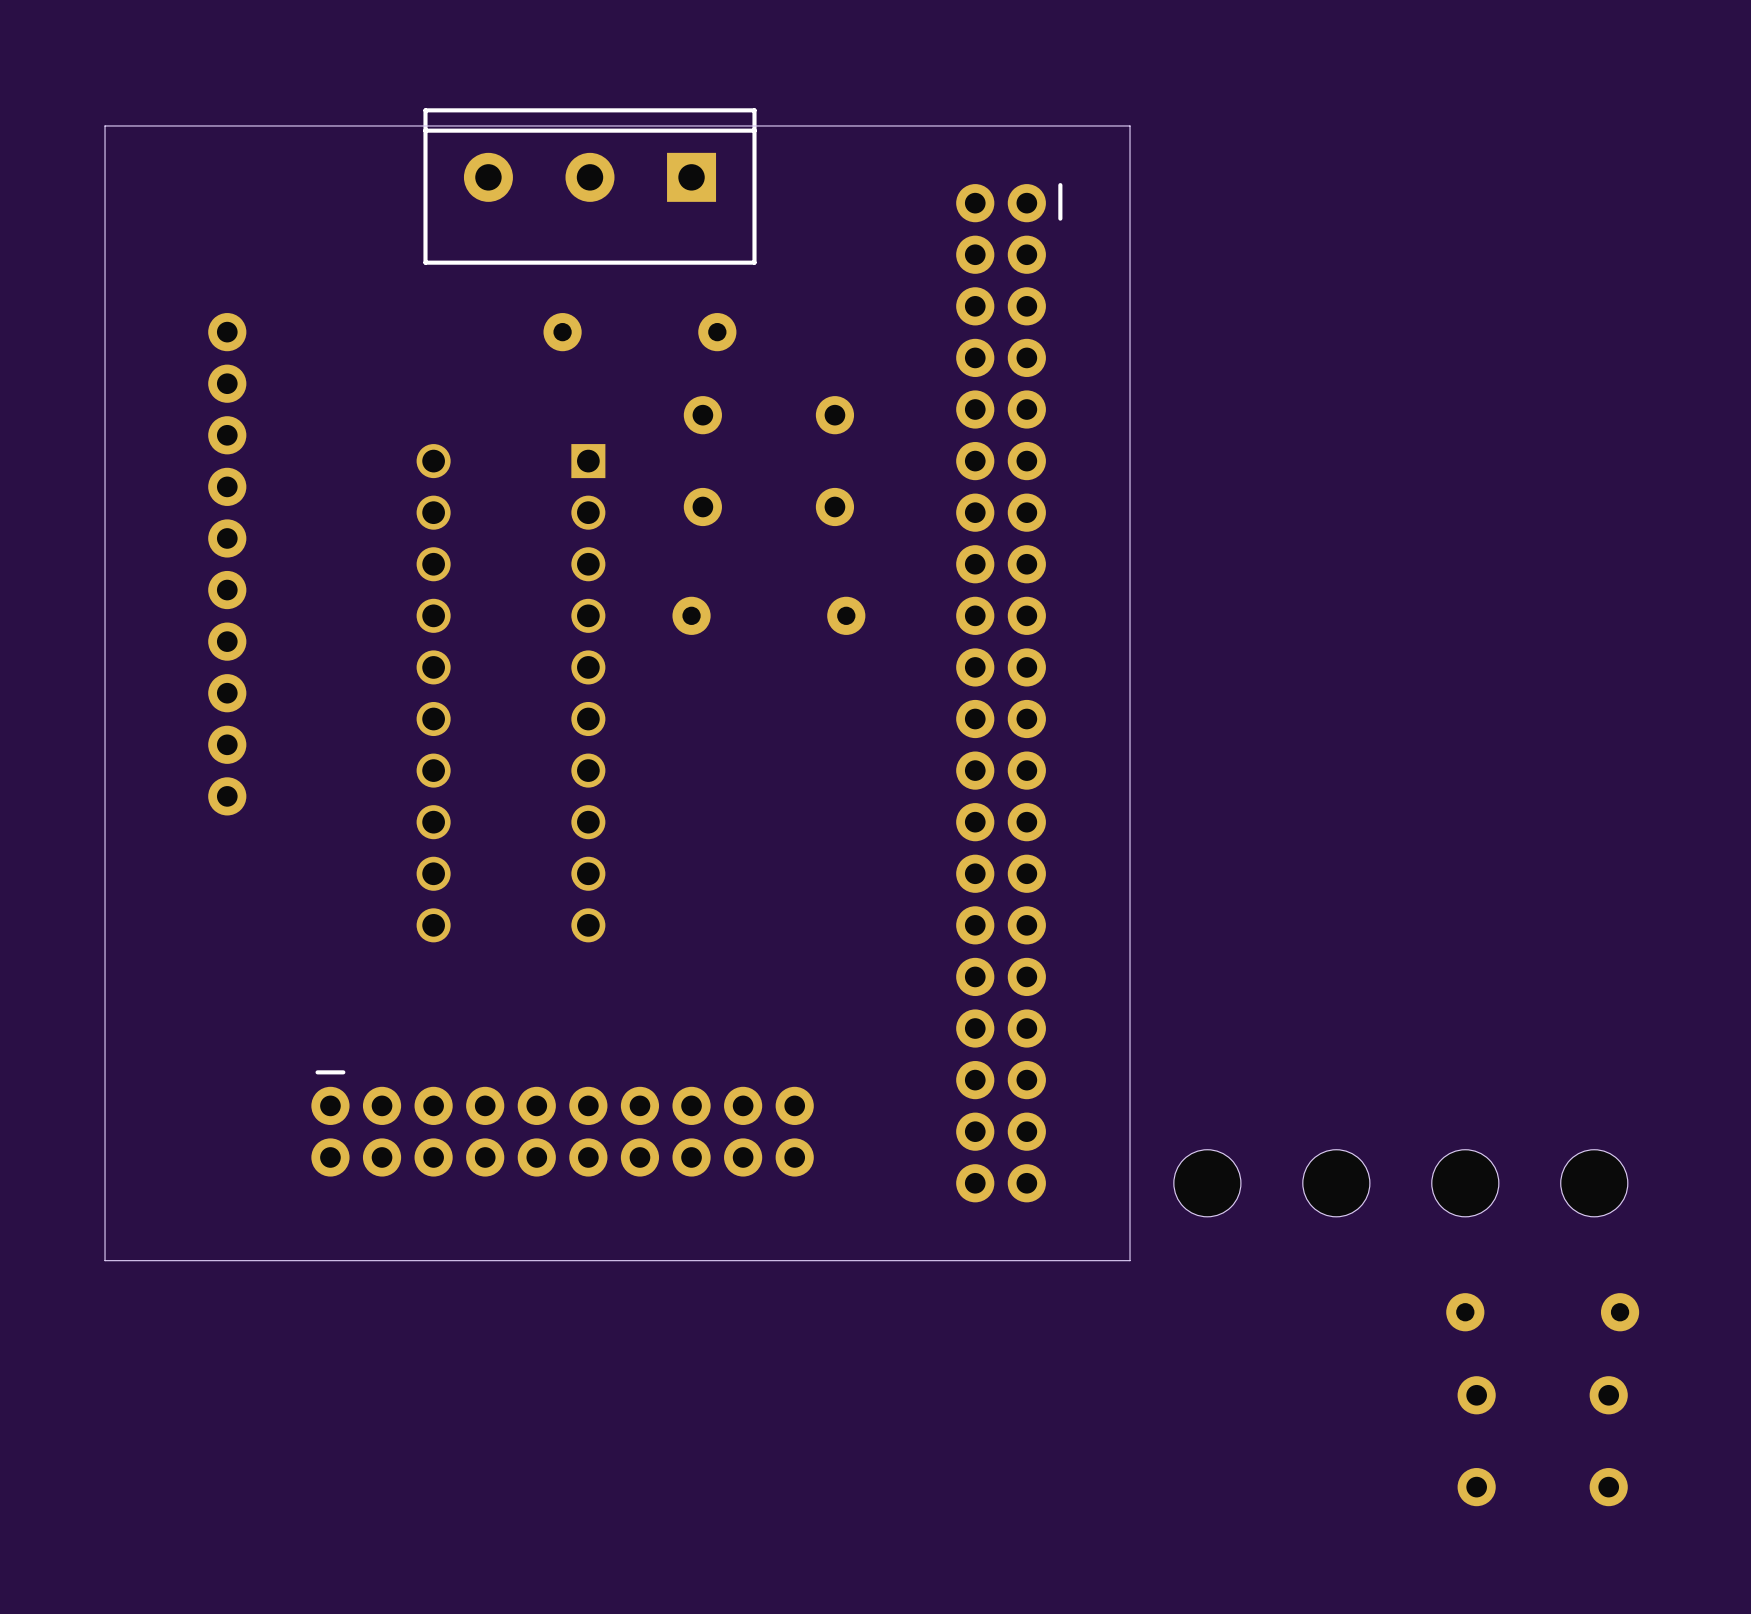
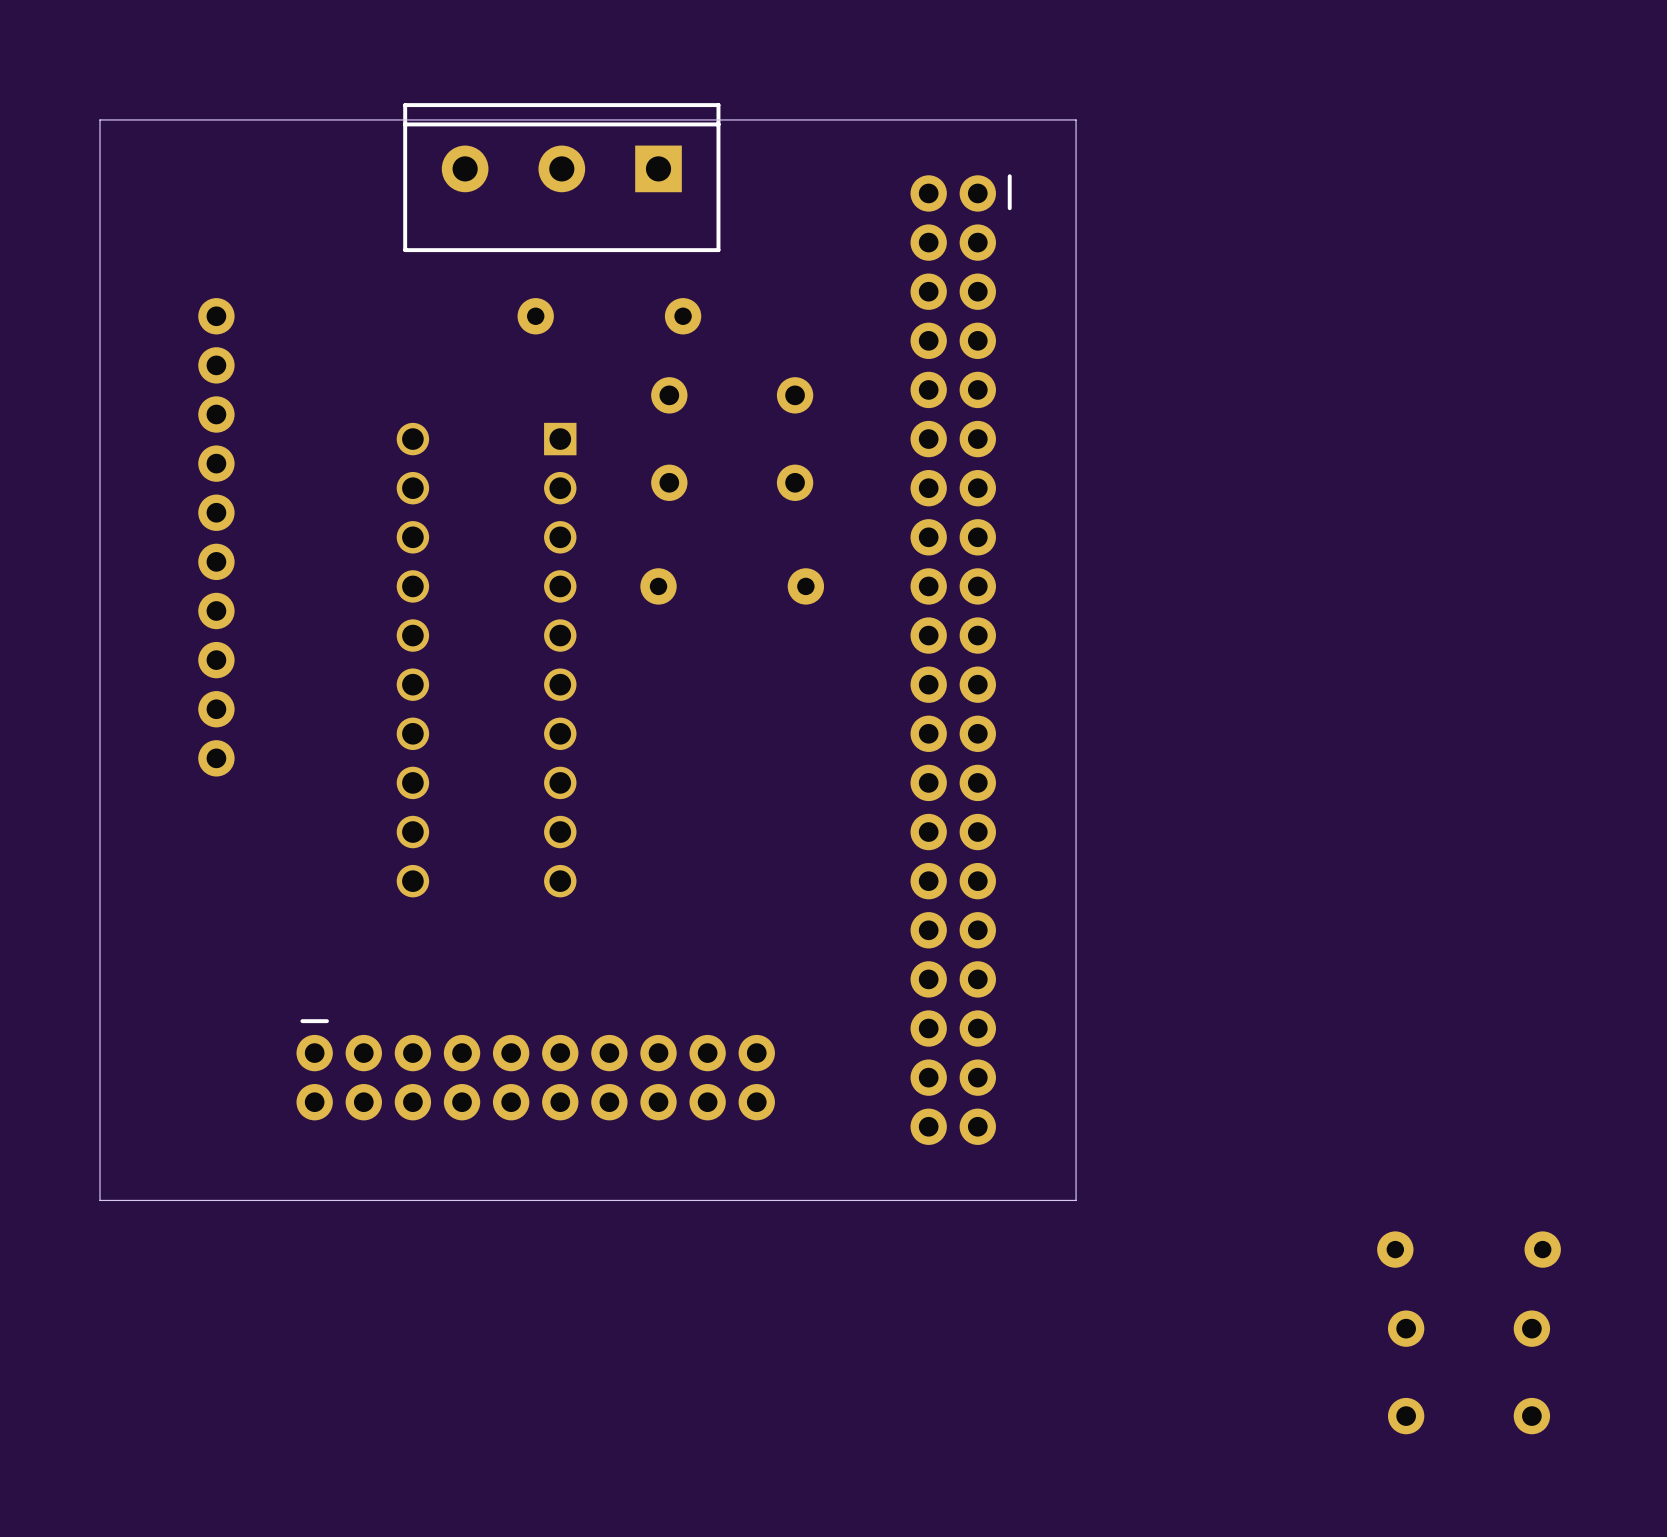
part: (1207, 1183) -> none
part: (1336, 1183) -> none
part: (1465, 1183) -> none
part: (1594, 1183) -> none

